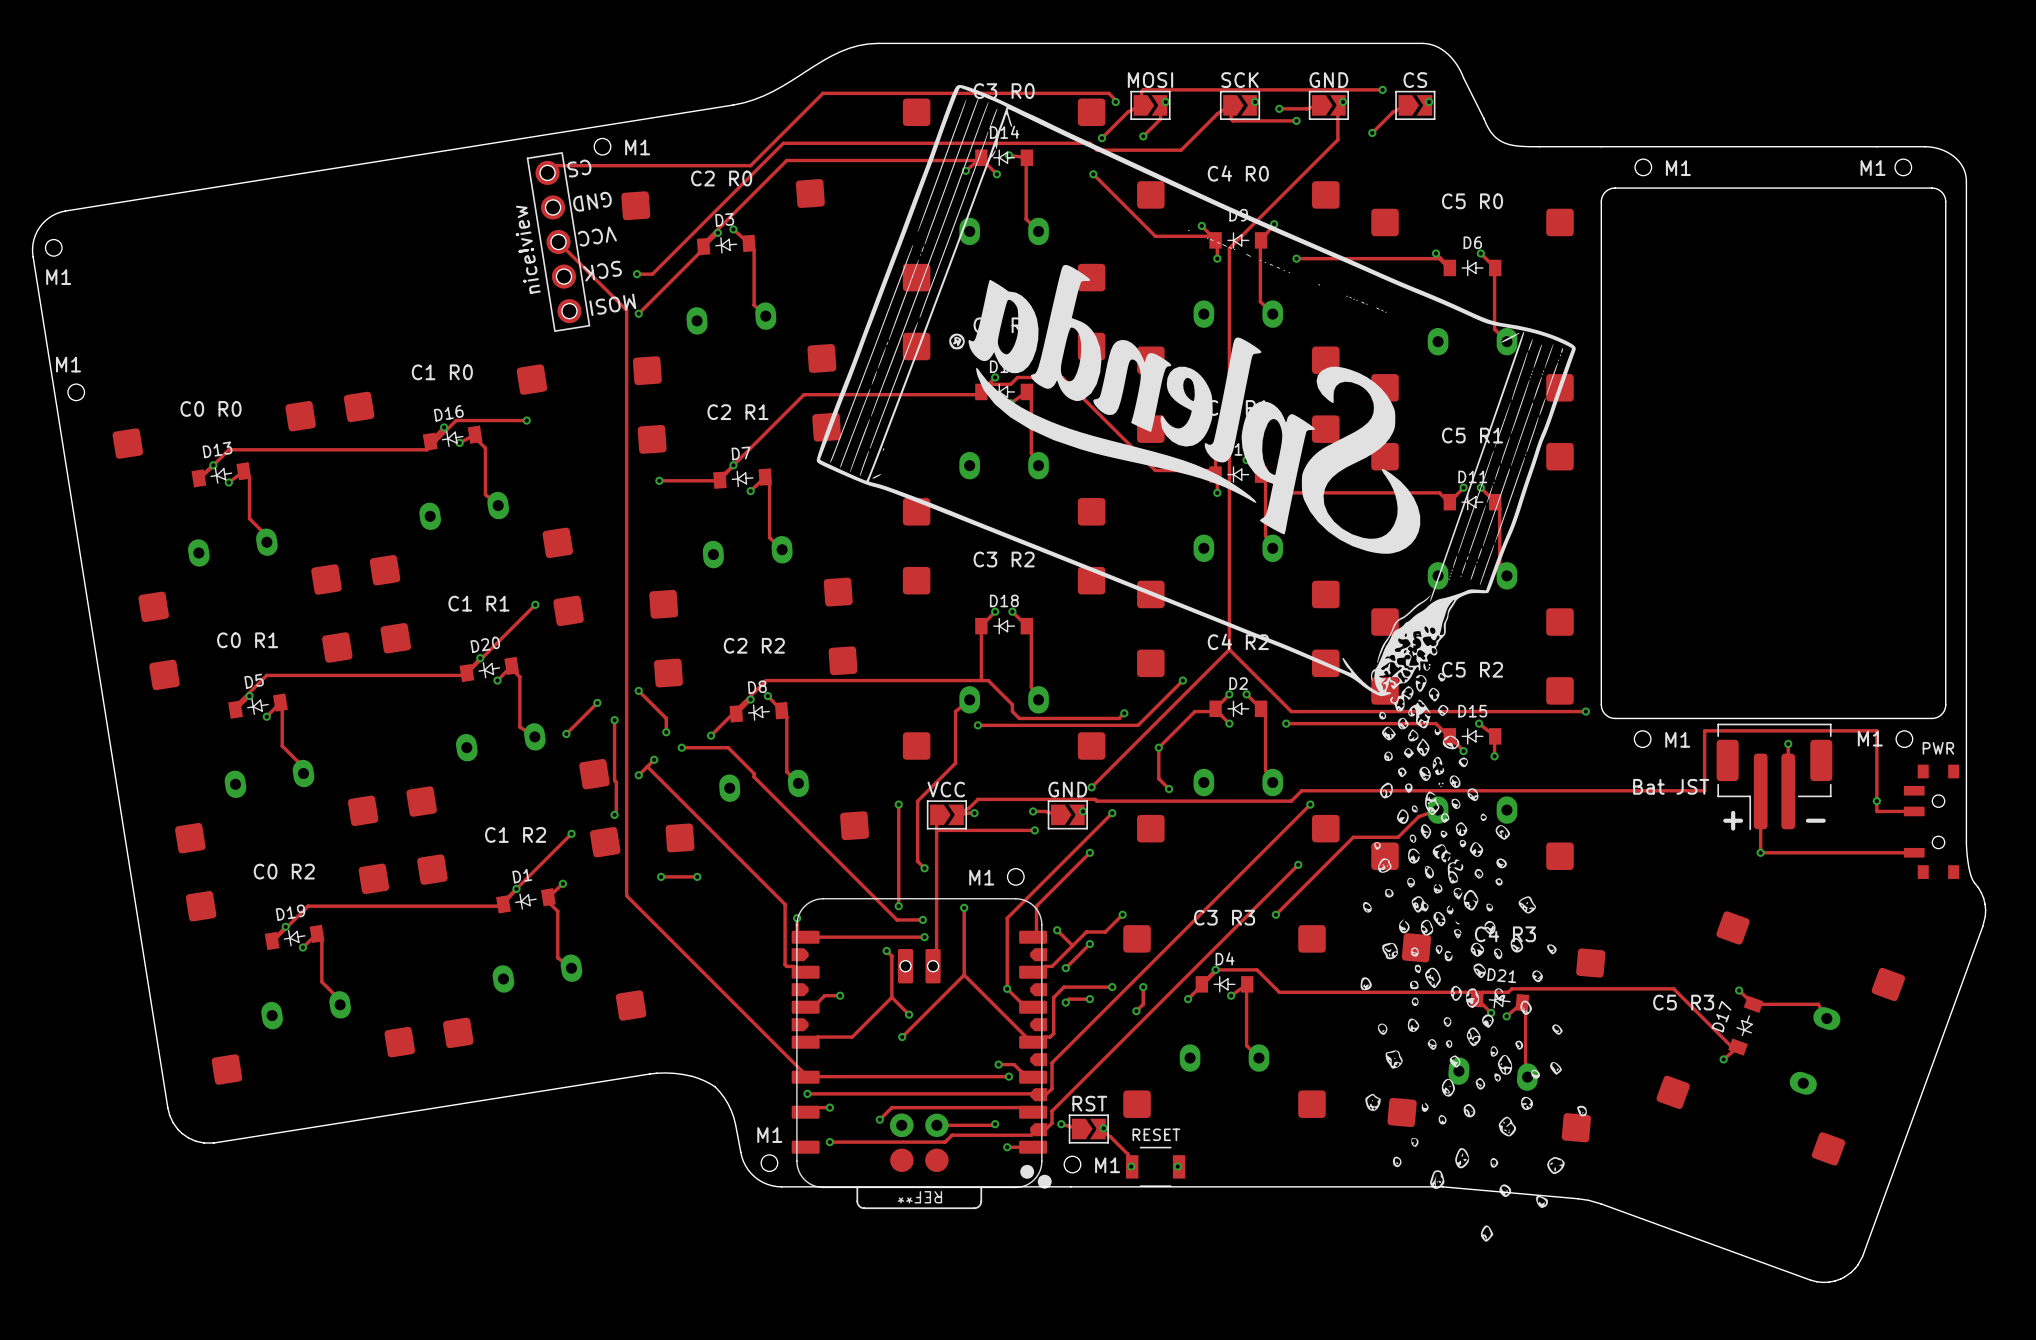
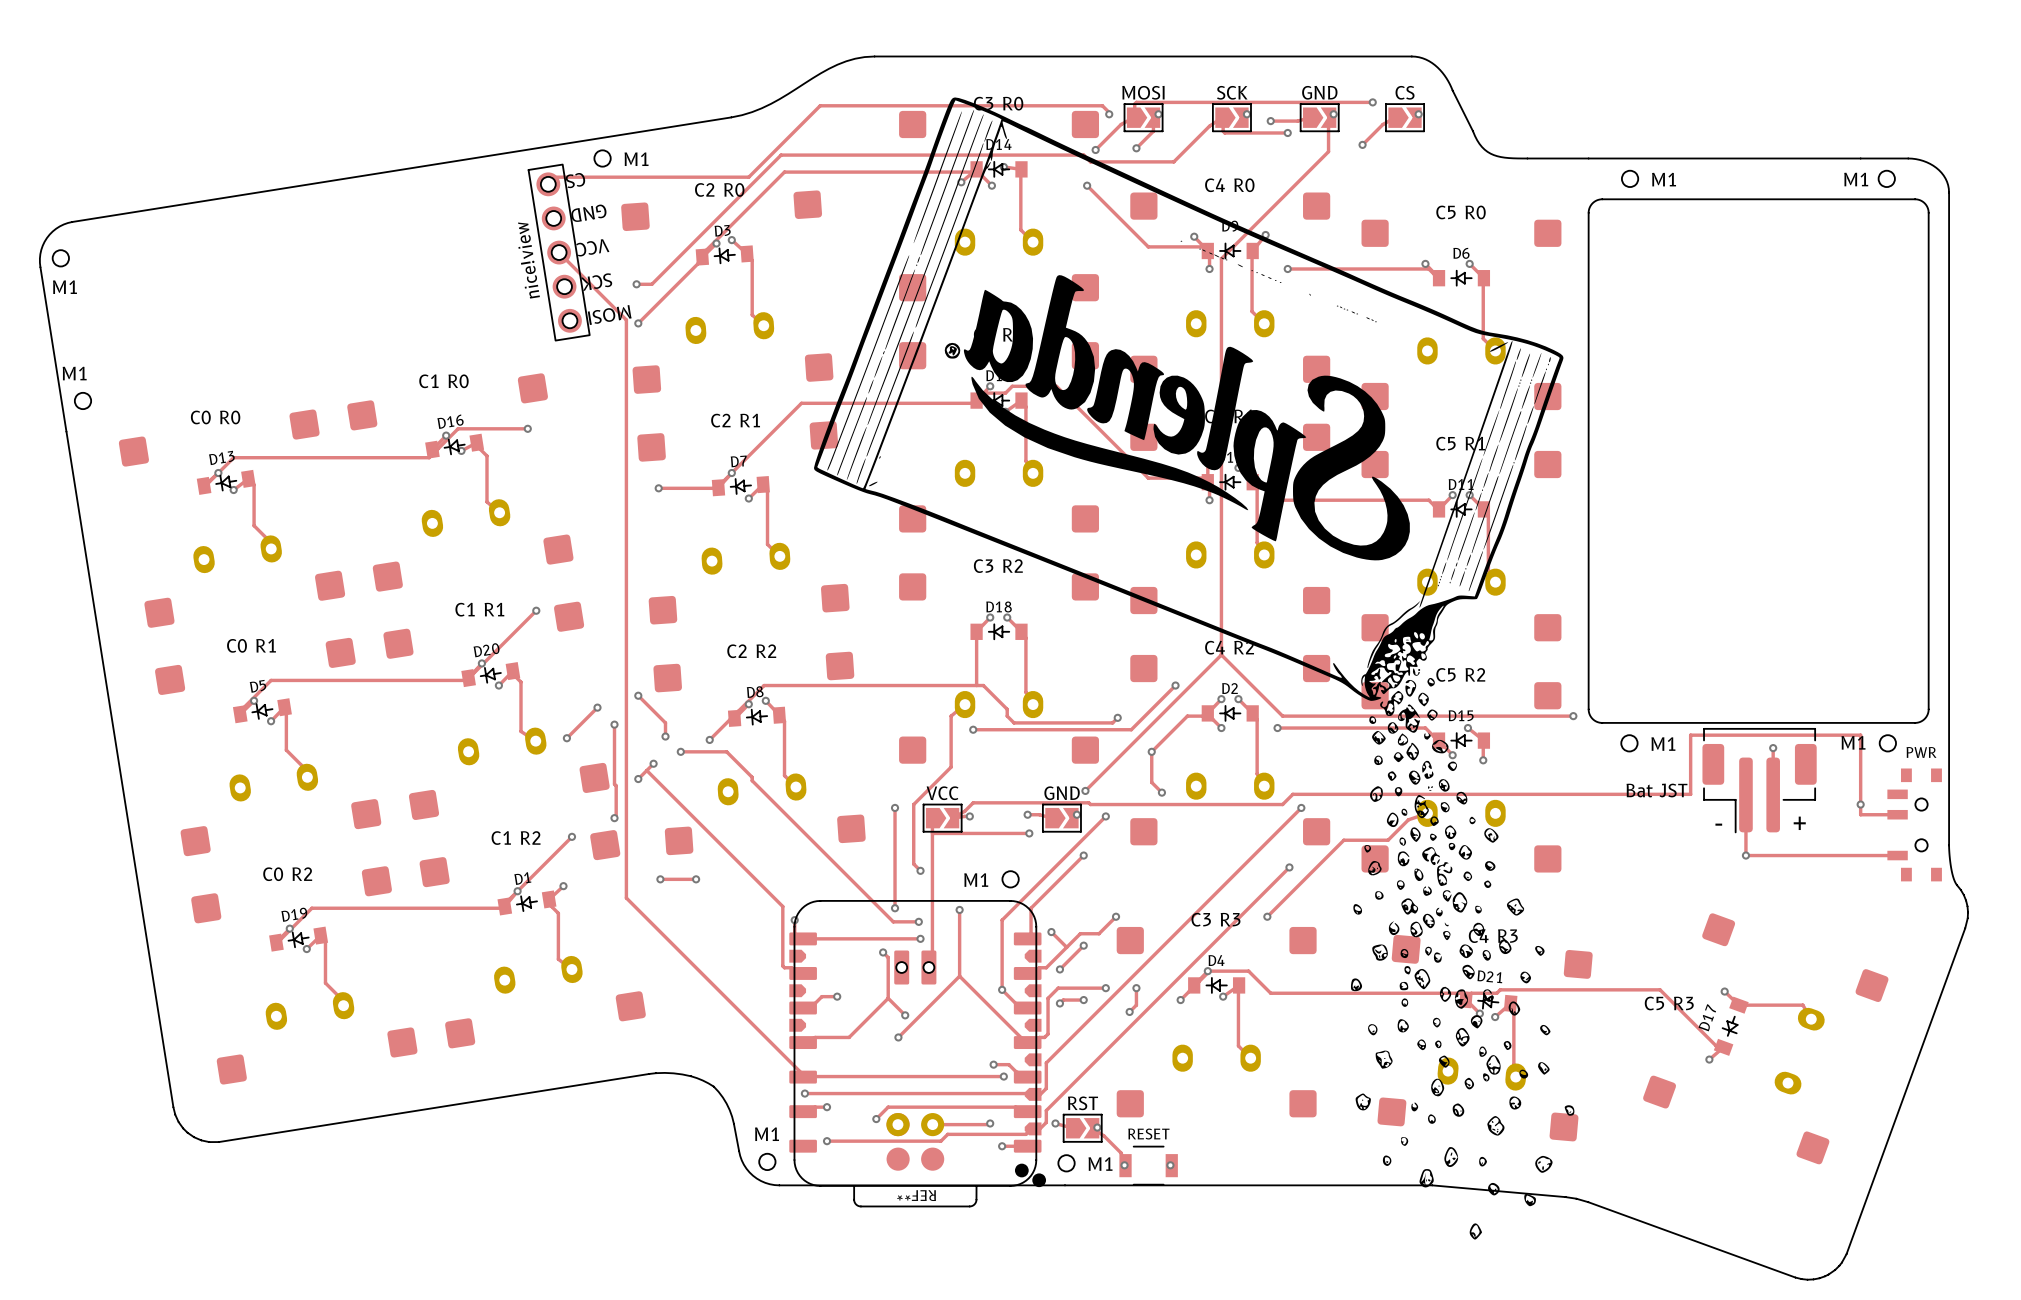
text: + (1733, 820) -> - (1718, 824)
text: - (1815, 820) -> + (1799, 823)

